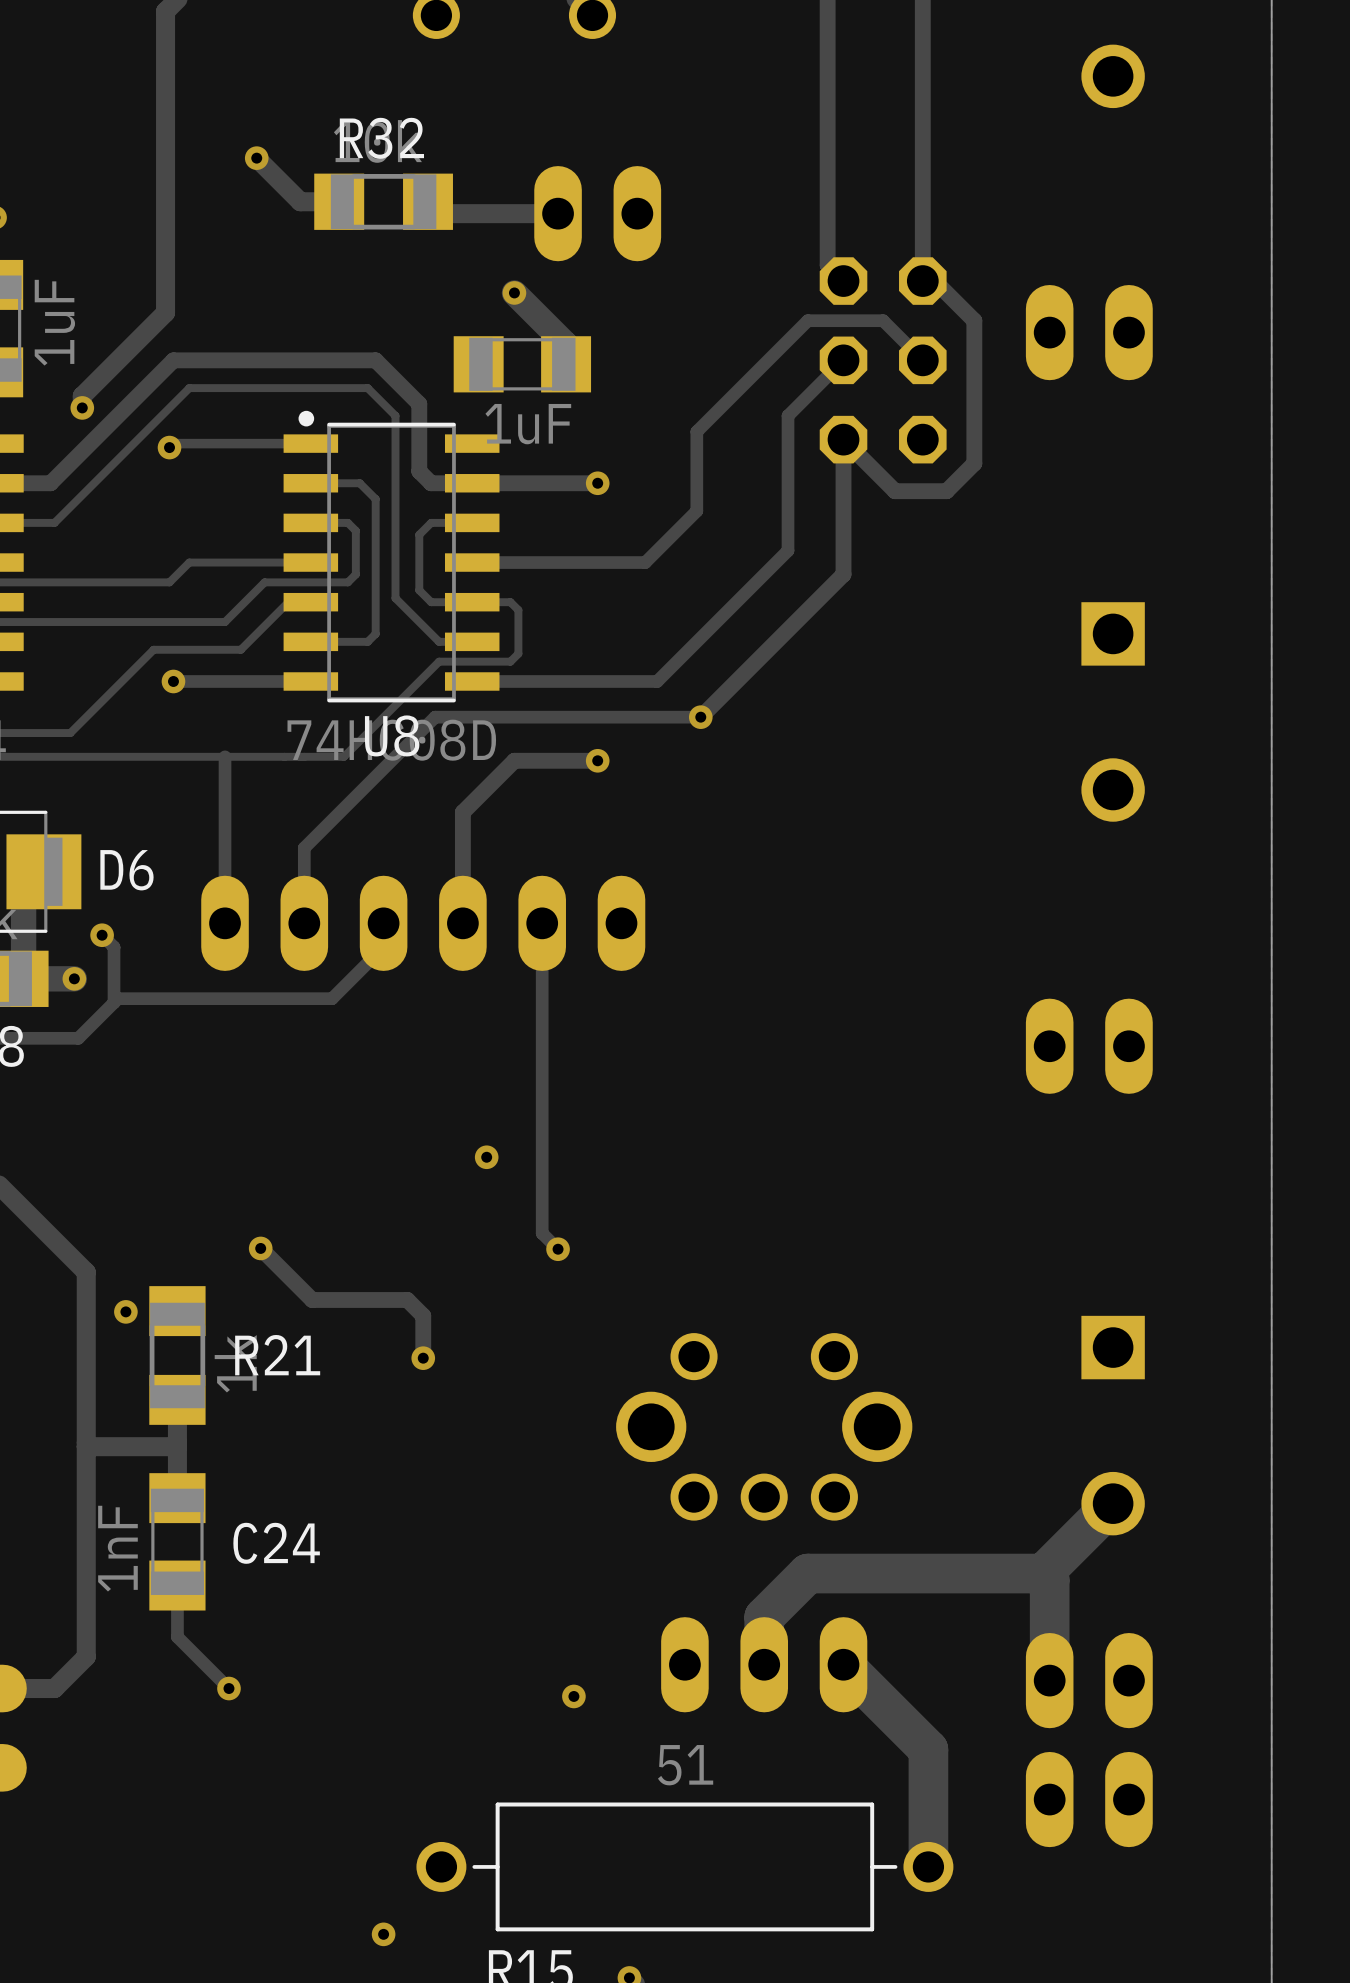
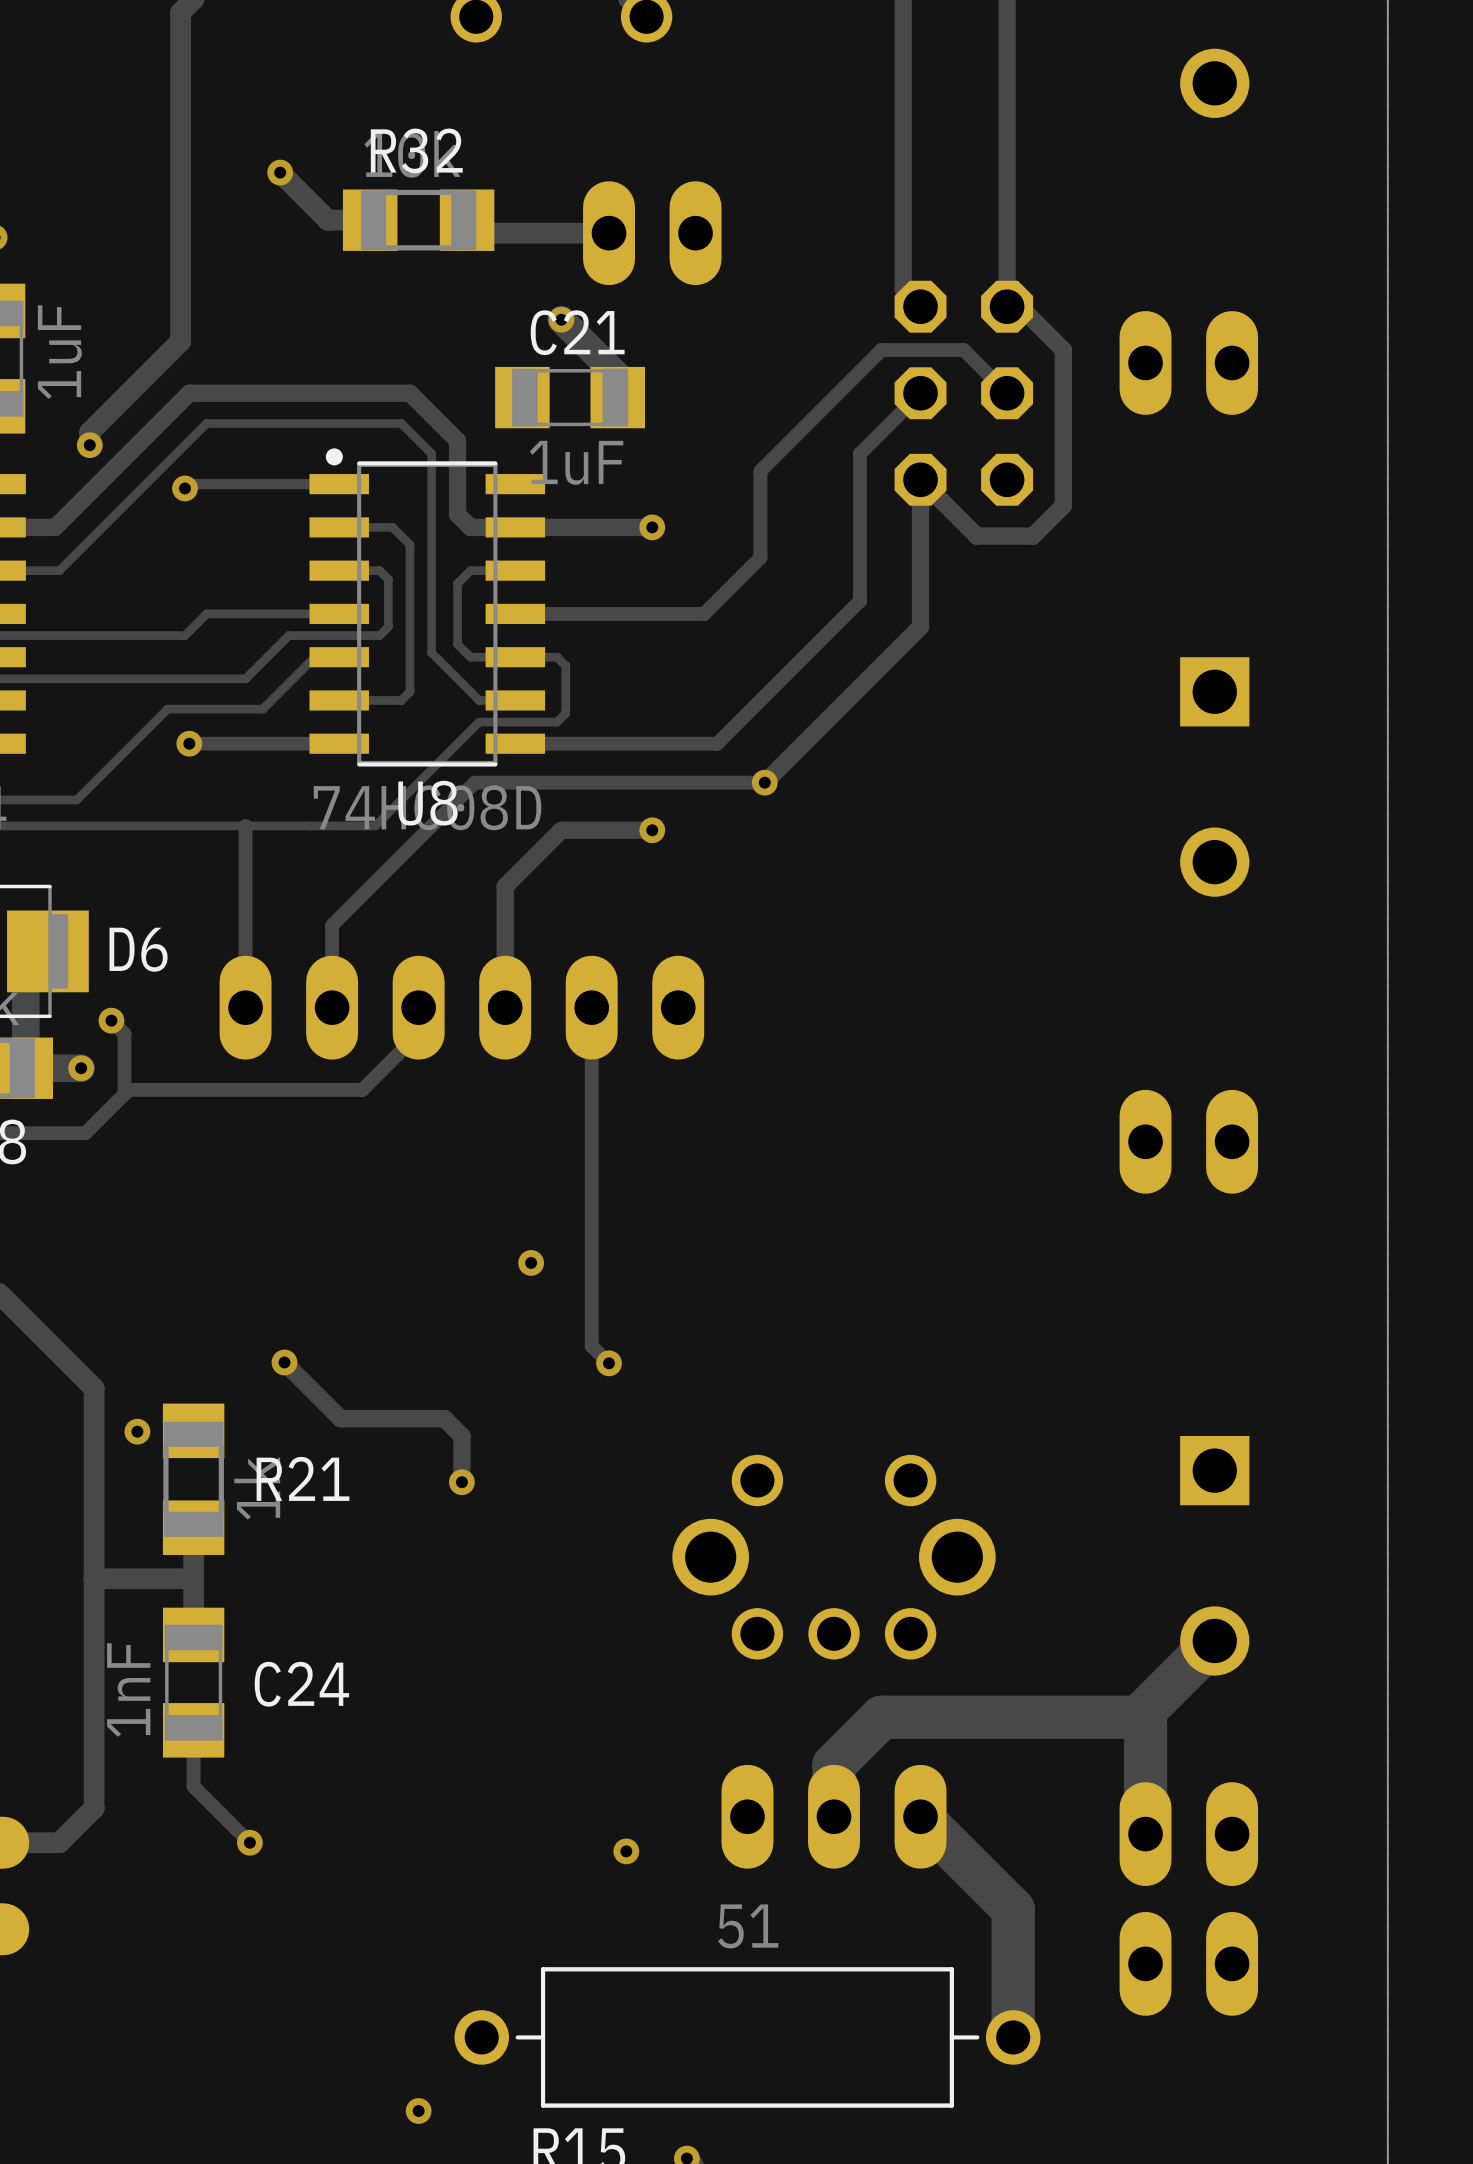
C21 name: none -> C21 (577, 332)

